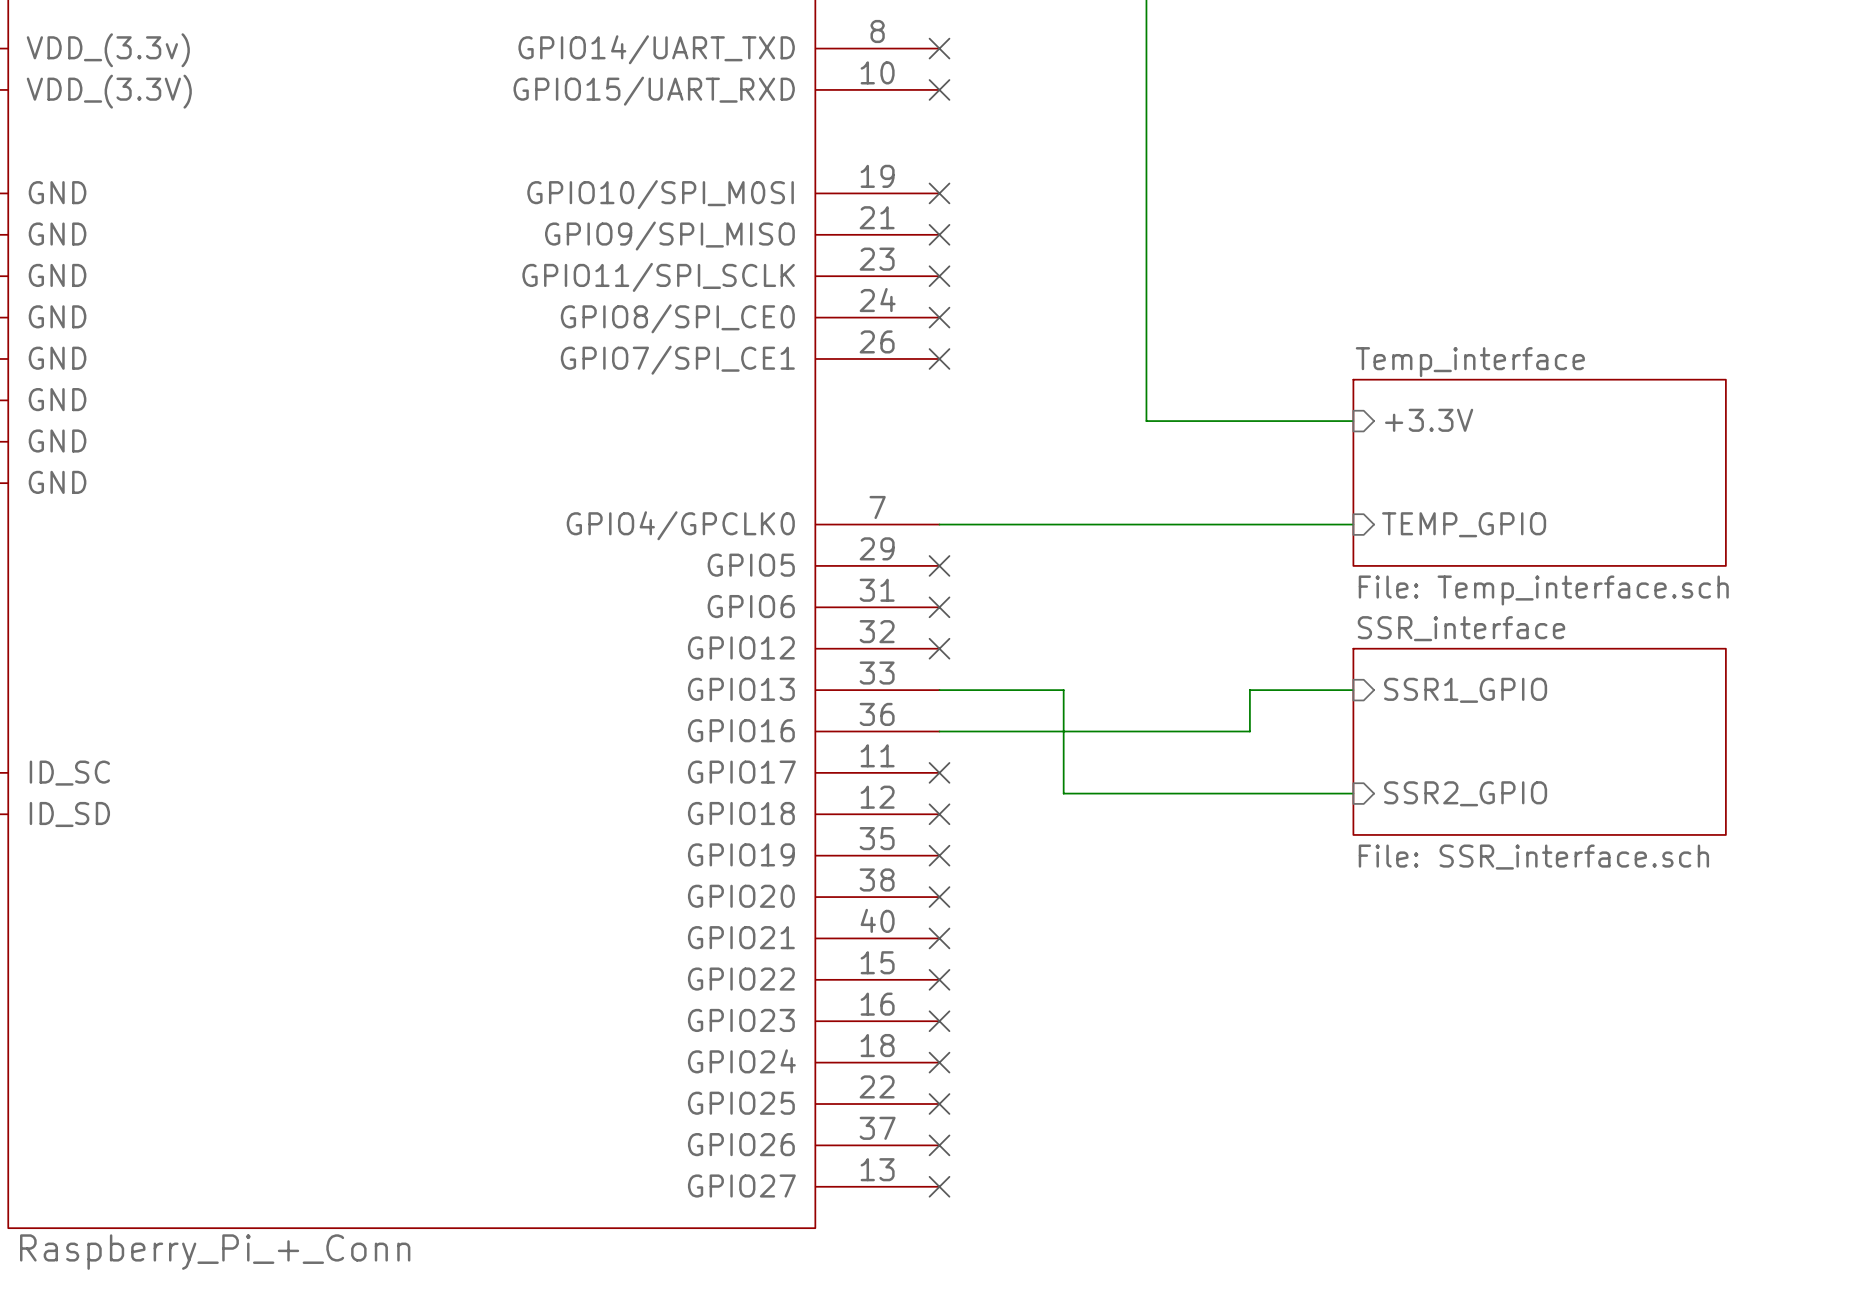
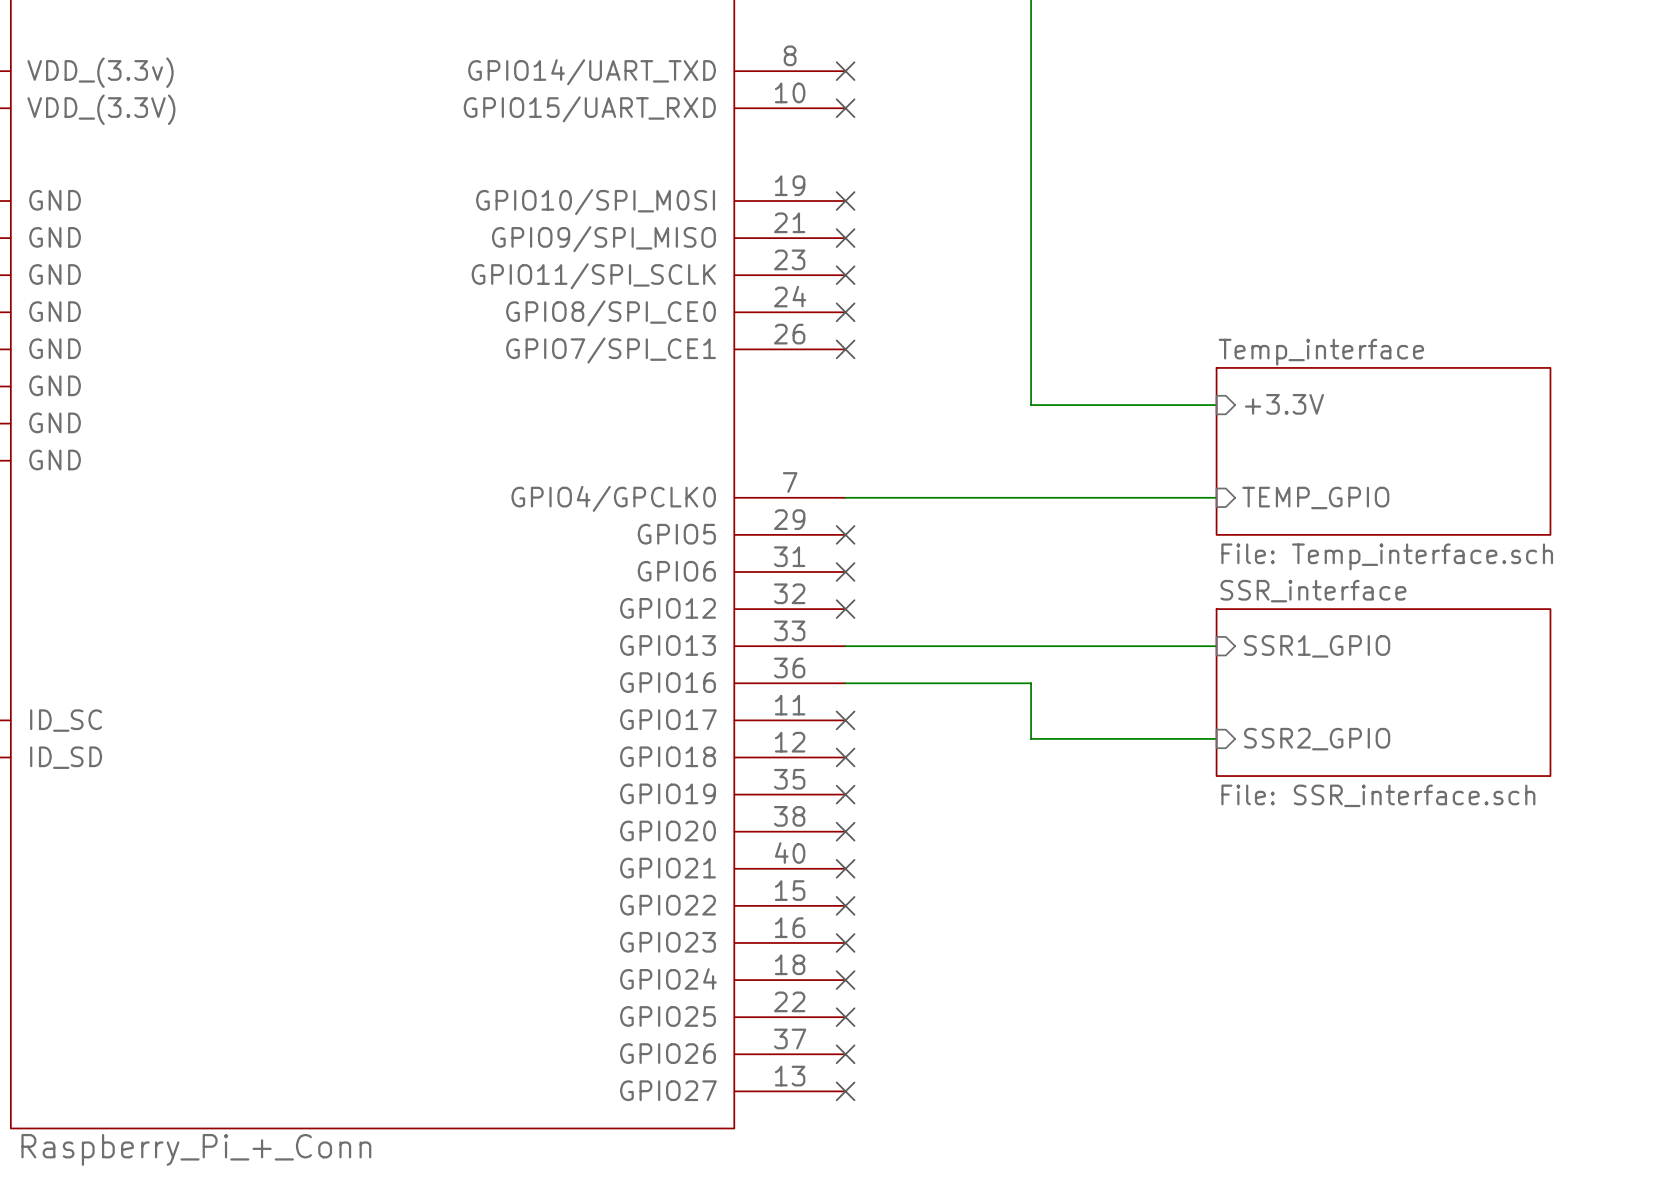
wire: (1063, 690) (1063, 793) (1146, 793) -> (1031, 683) (1031, 738)
wire: (1249, 690) (1249, 731) (1146, 731) -> (1123, 646) (956, 646)

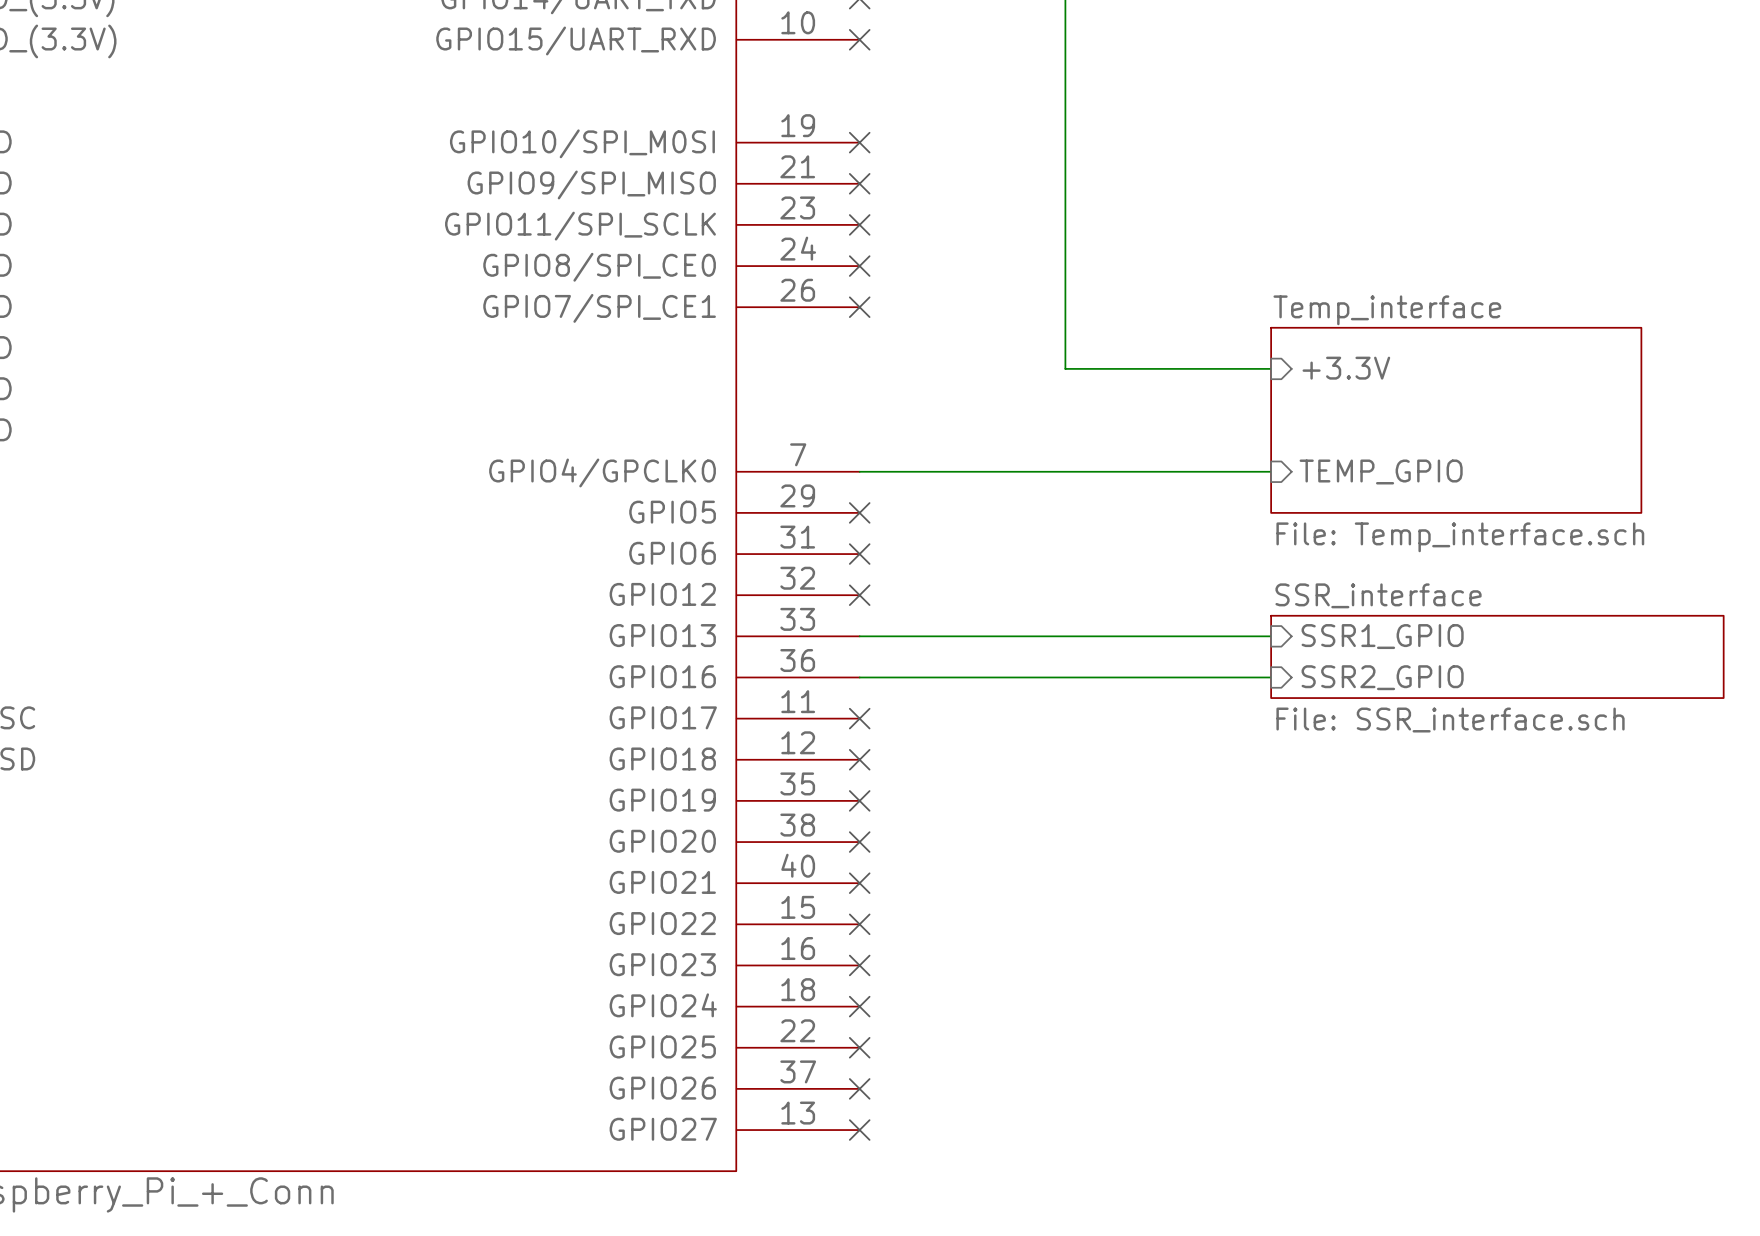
sheet SSR_interface: none -> File: SSR_interface.sch (1497, 656)
wire: (1031, 683) (1031, 738) (1216, 738) -> (1065, 677) (1271, 677)
sheet SSR_interface: File: SSR_interface.sch (1383, 692) -> none
sheet pin position: SSR2_GPIO (1317, 739) -> SSR2_GPIO (1382, 677)

